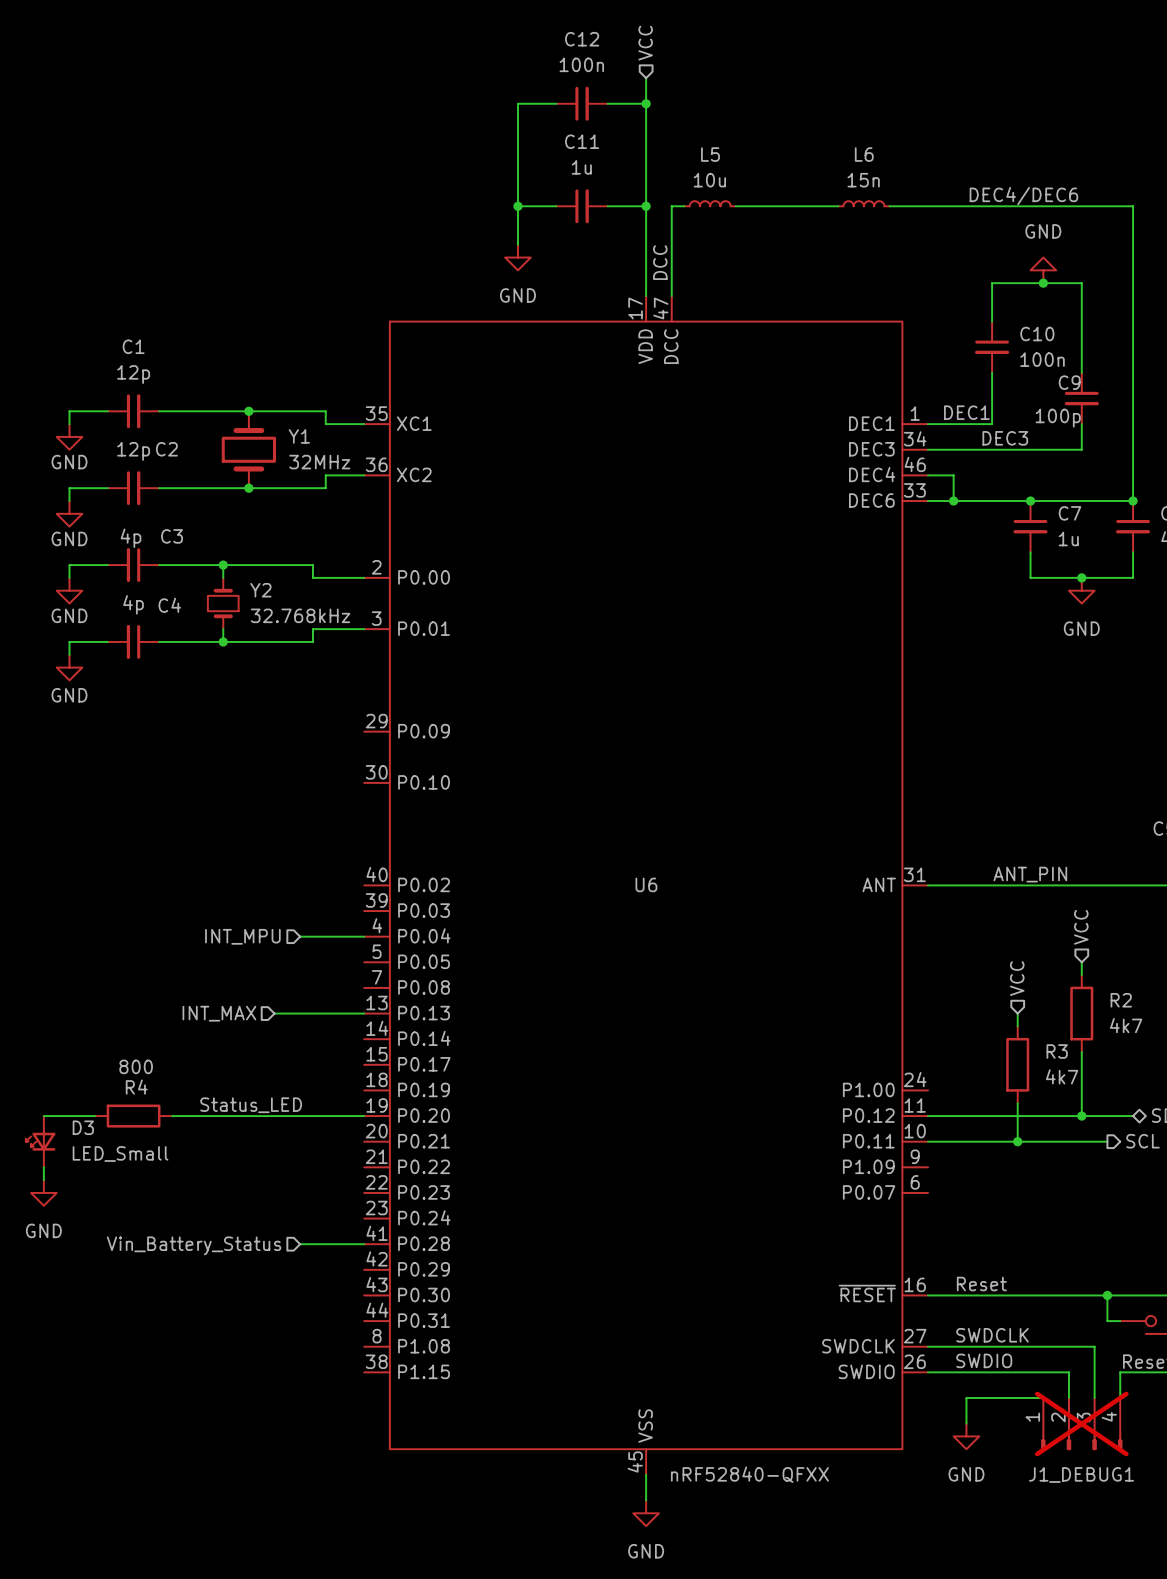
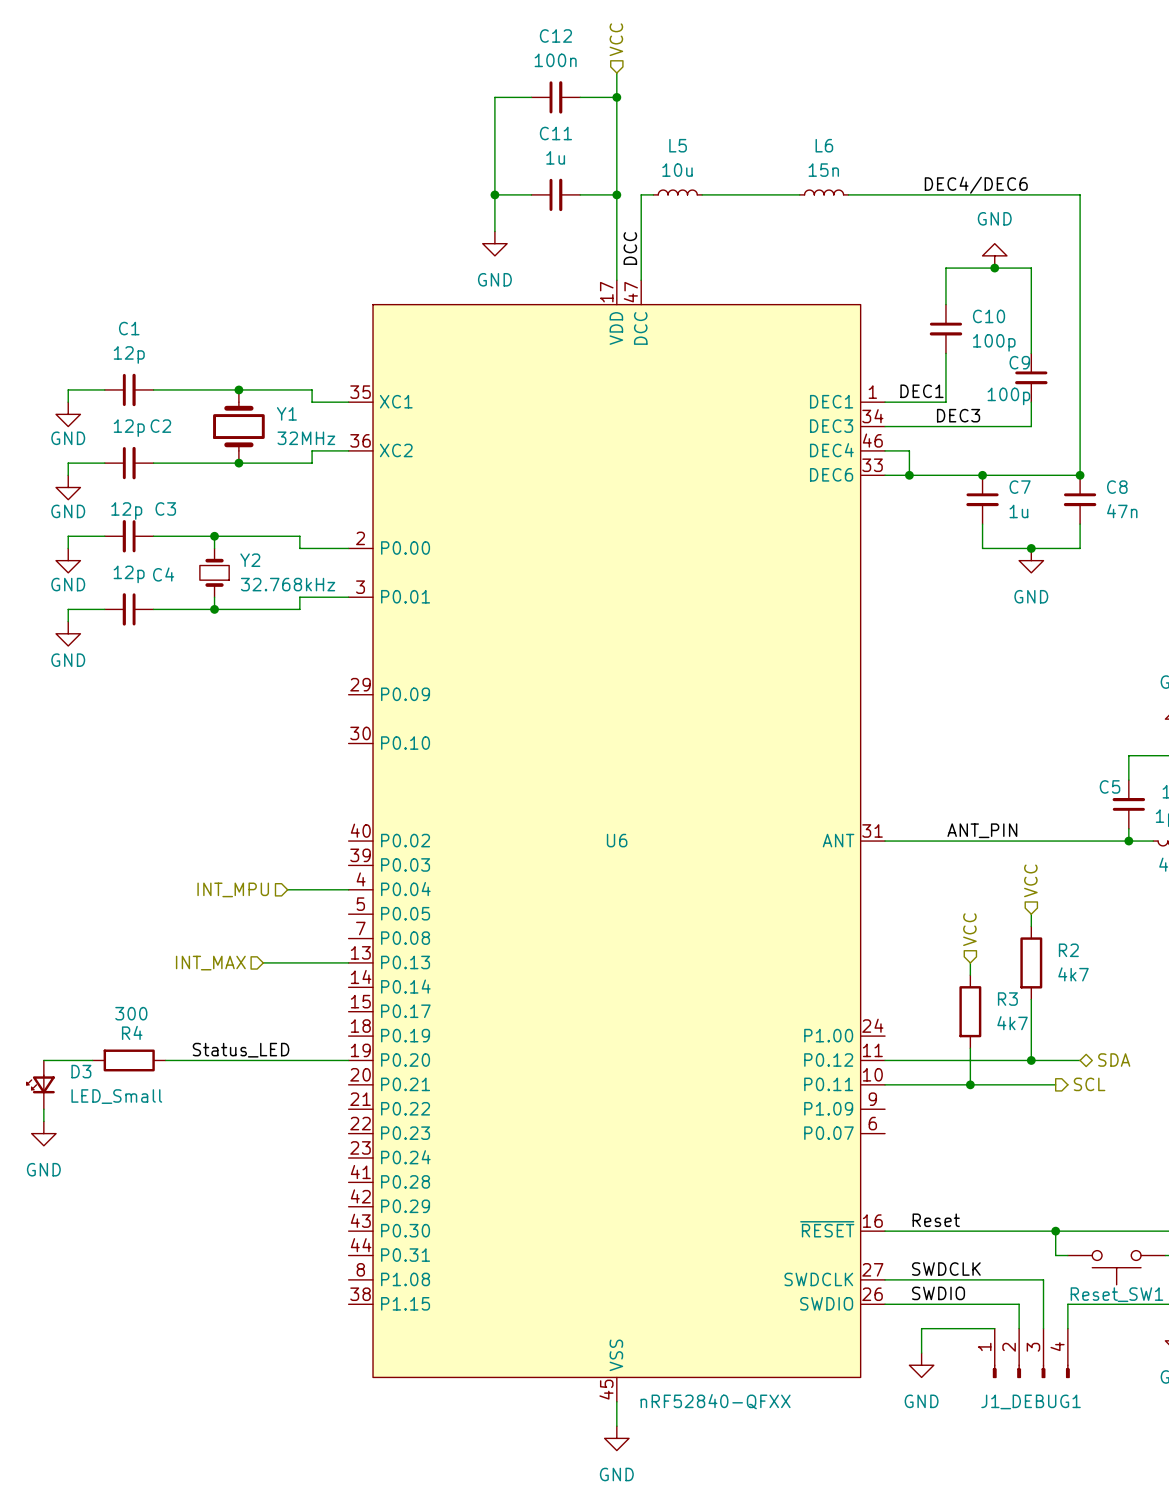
C10 value: 100n (1042, 359) -> 100p (994, 342)
C3 value: 4p (131, 538) -> 12p (126, 511)
C4 value: 4p (133, 604) -> 12p (129, 574)
R4 value: 800 (136, 1066) -> 300 (131, 1013)
wire: (300, 1244) (364, 1244) -> none
hierarchical label: Vin_Battery_Status (194, 1245) -> none
J1_DEBUG1 do-not-place cross: (1081, 1423) -> none

